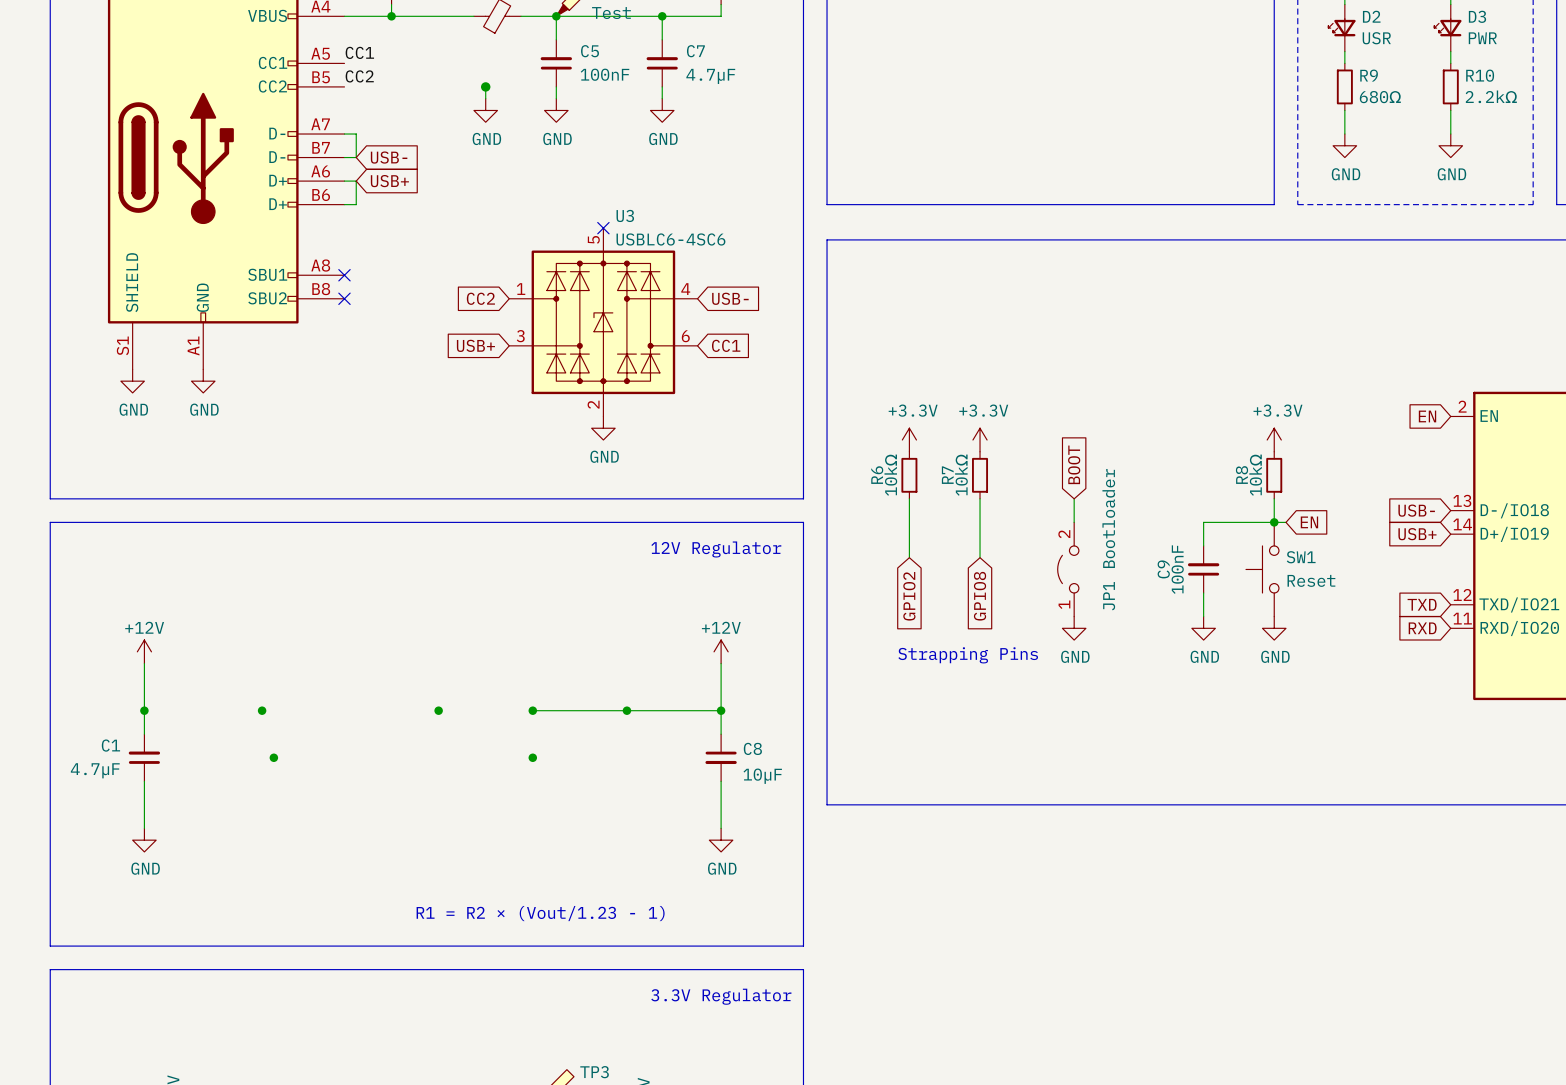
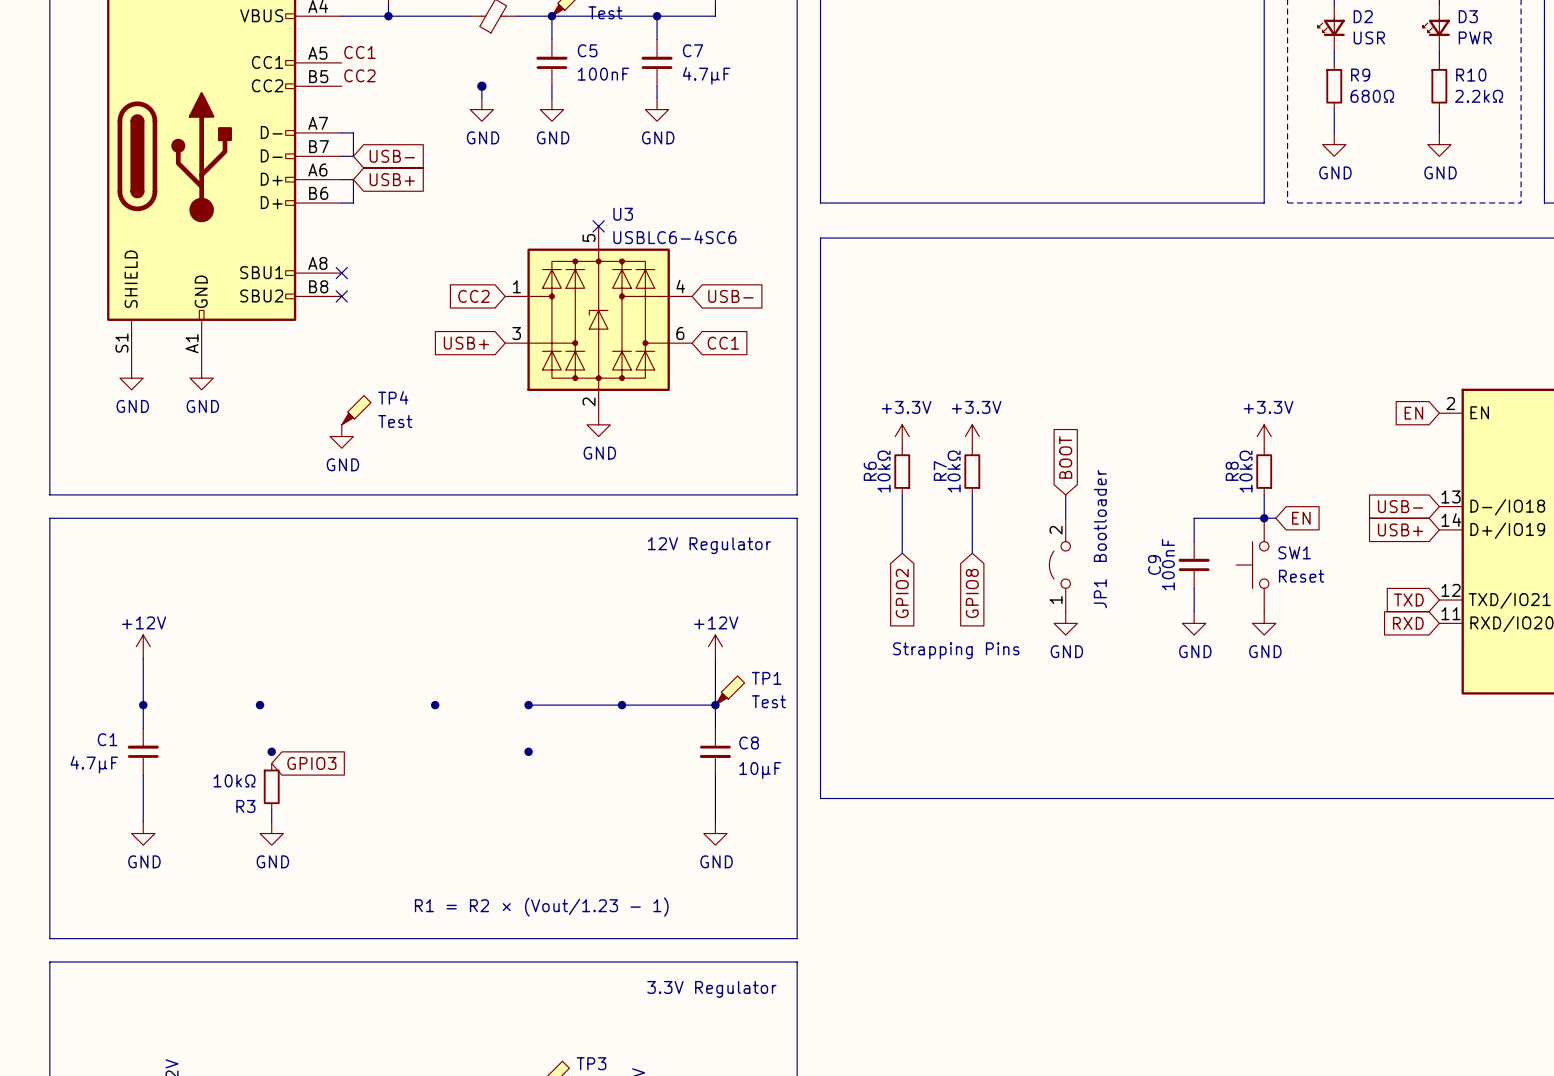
TP4: none -> Test (356, 410)
power symbol: none -> GND (341, 436)
TP1: none -> Test (730, 690)
global label: none -> GPIO3 (311, 763)
R3: none -> 10kΩ (271, 786)
wire: none -> (271, 810) (271, 821)
power symbol: none -> GND (271, 833)

